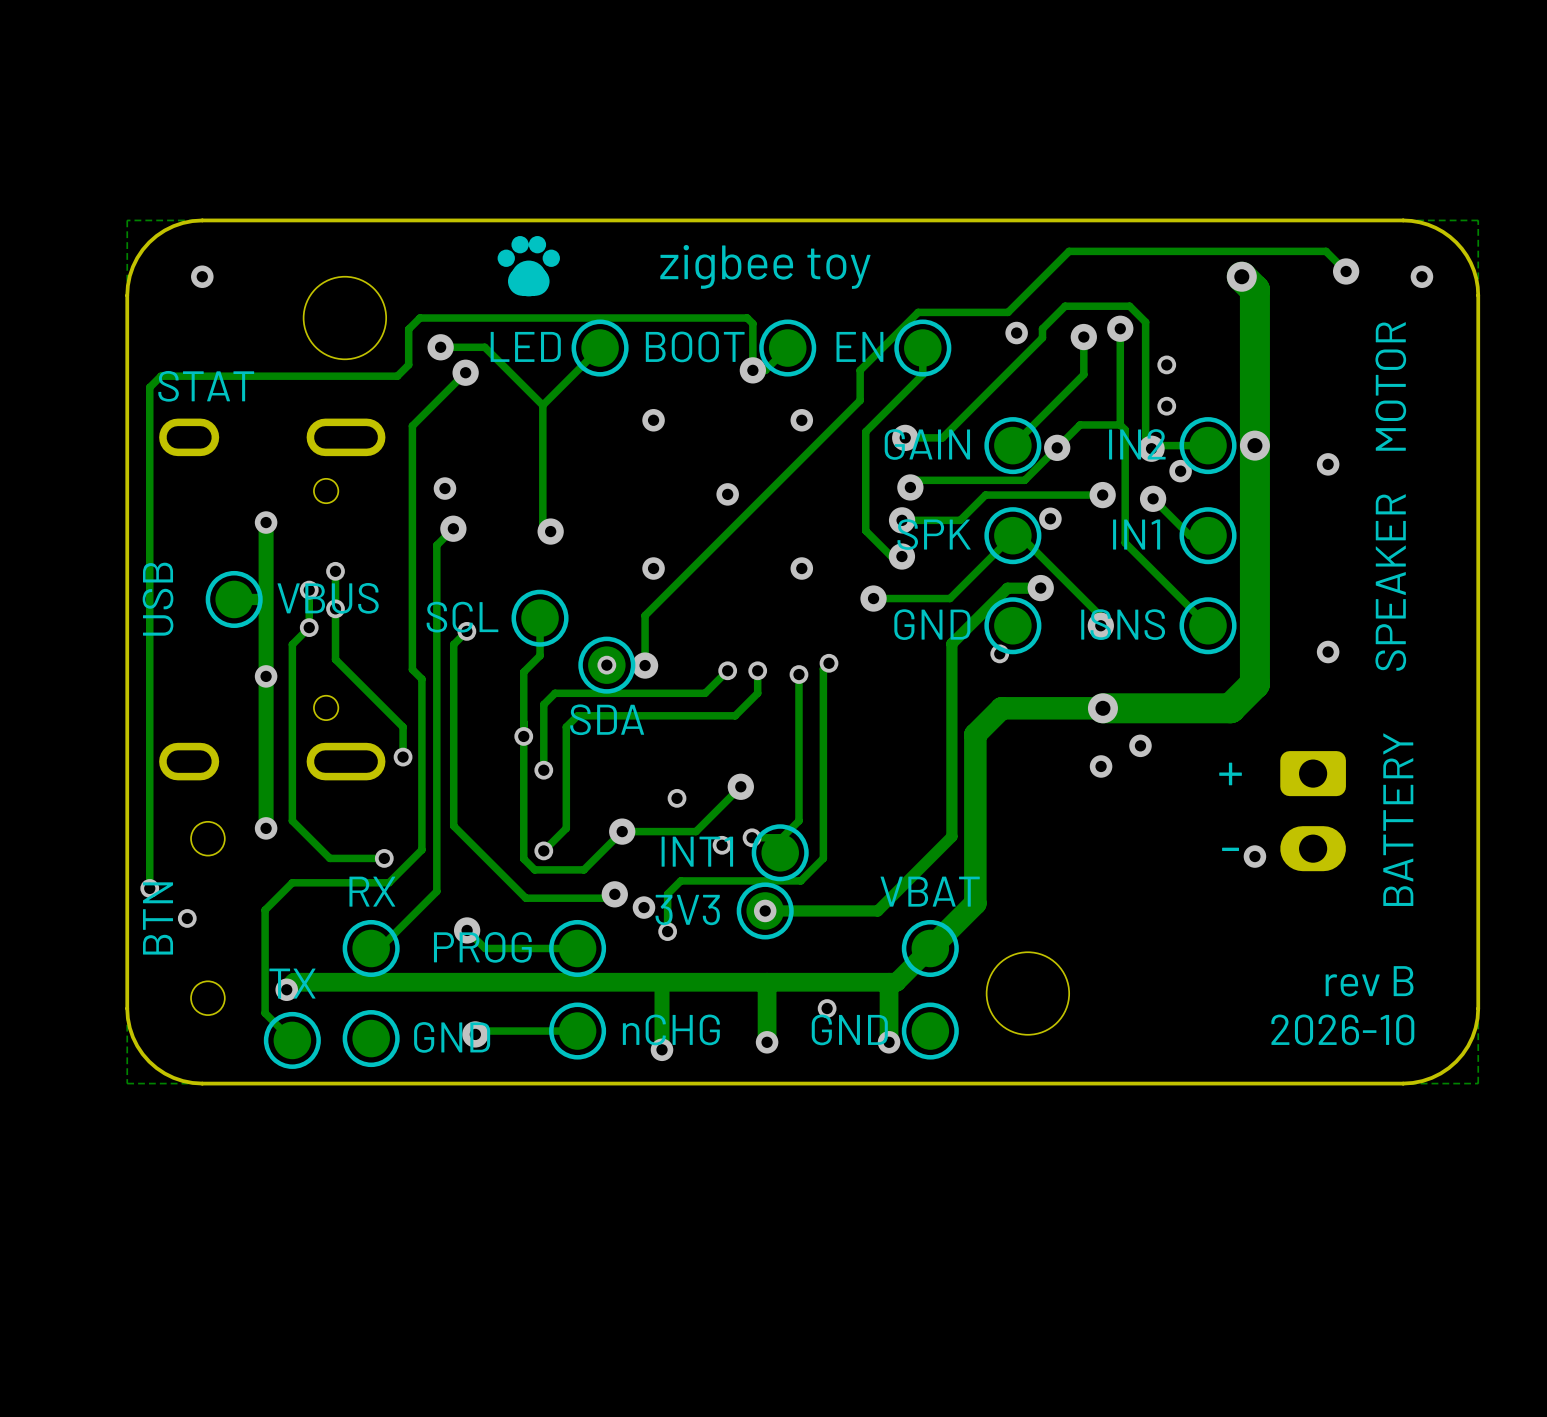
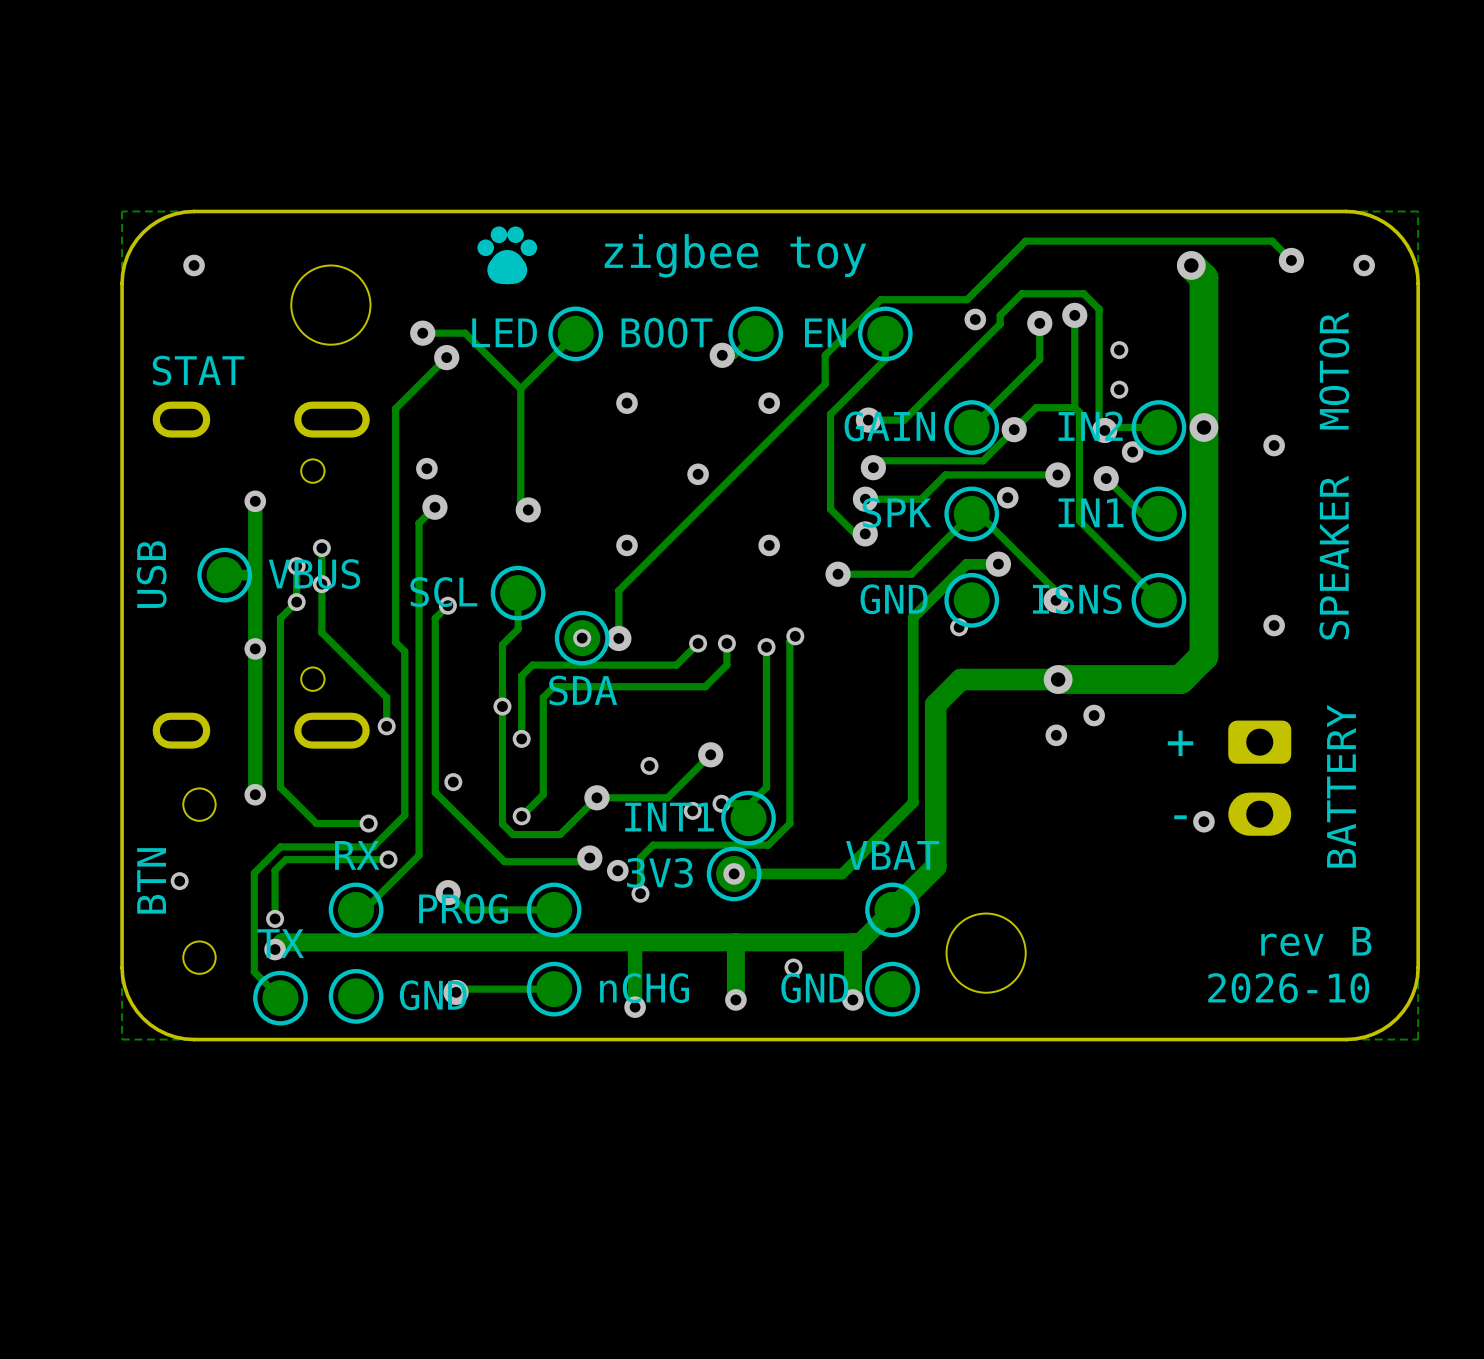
track: (752, 370) (752, 323) (747, 318) (419, 318) (408, 329) (408, 364) (397, 376) (161, 376) (149, 387) (149, 888) -> none
via: none -> (453, 782)
via: (149, 888) -> none
track: none -> (388, 859) (285, 859) (275, 870) (275, 918)
via: none -> (388, 859)
via: none -> (275, 918)

